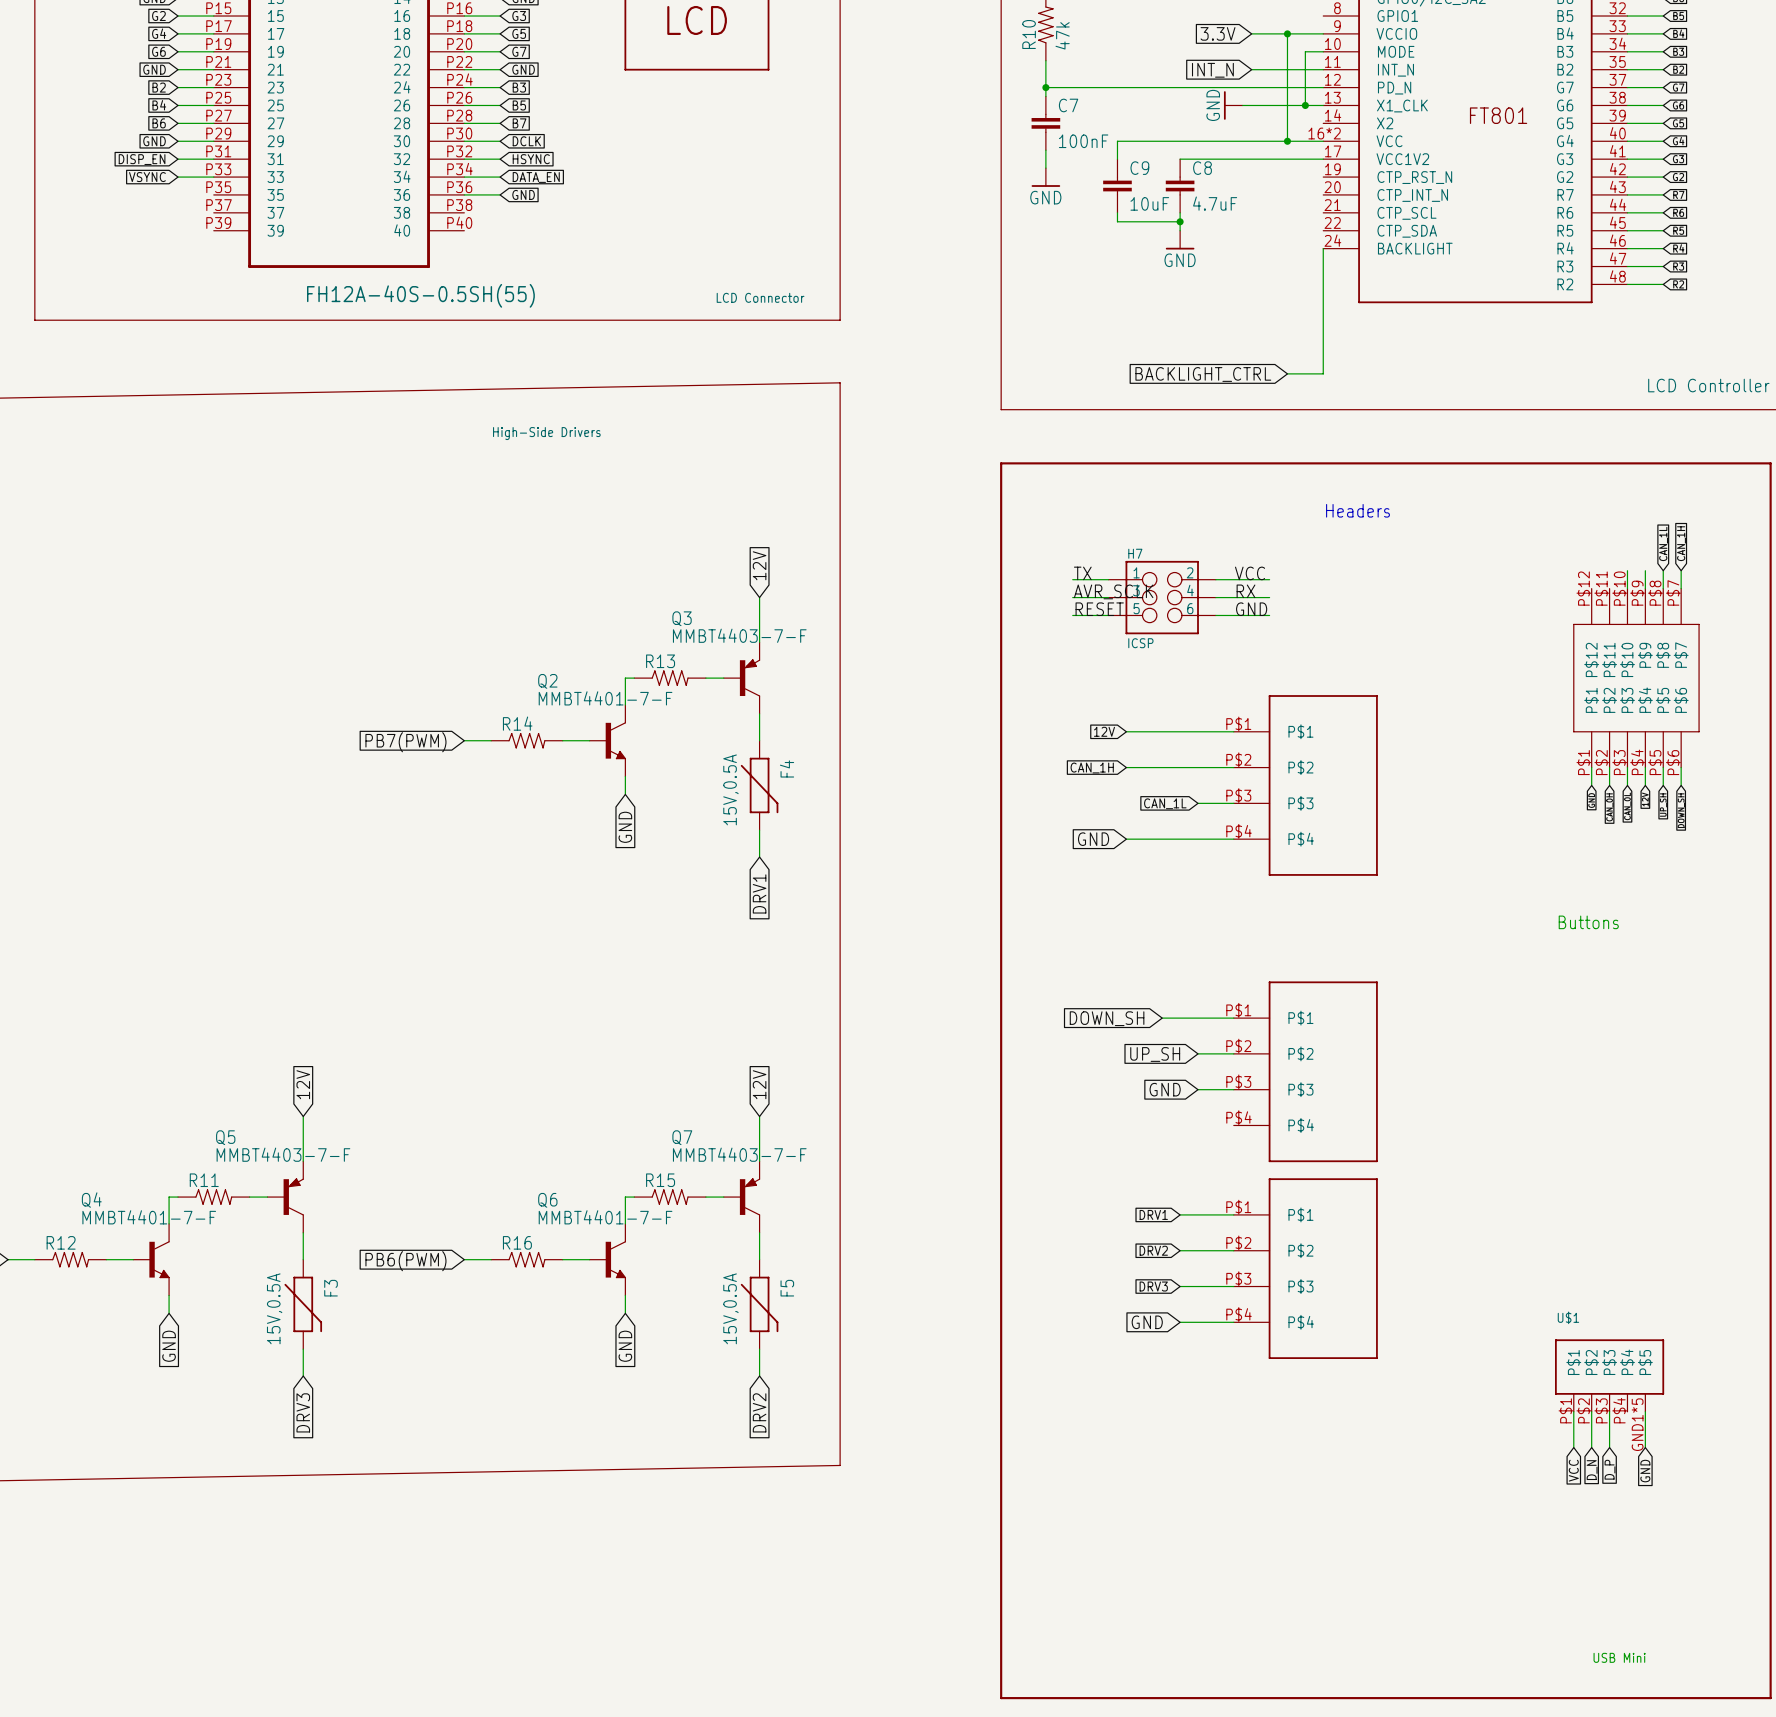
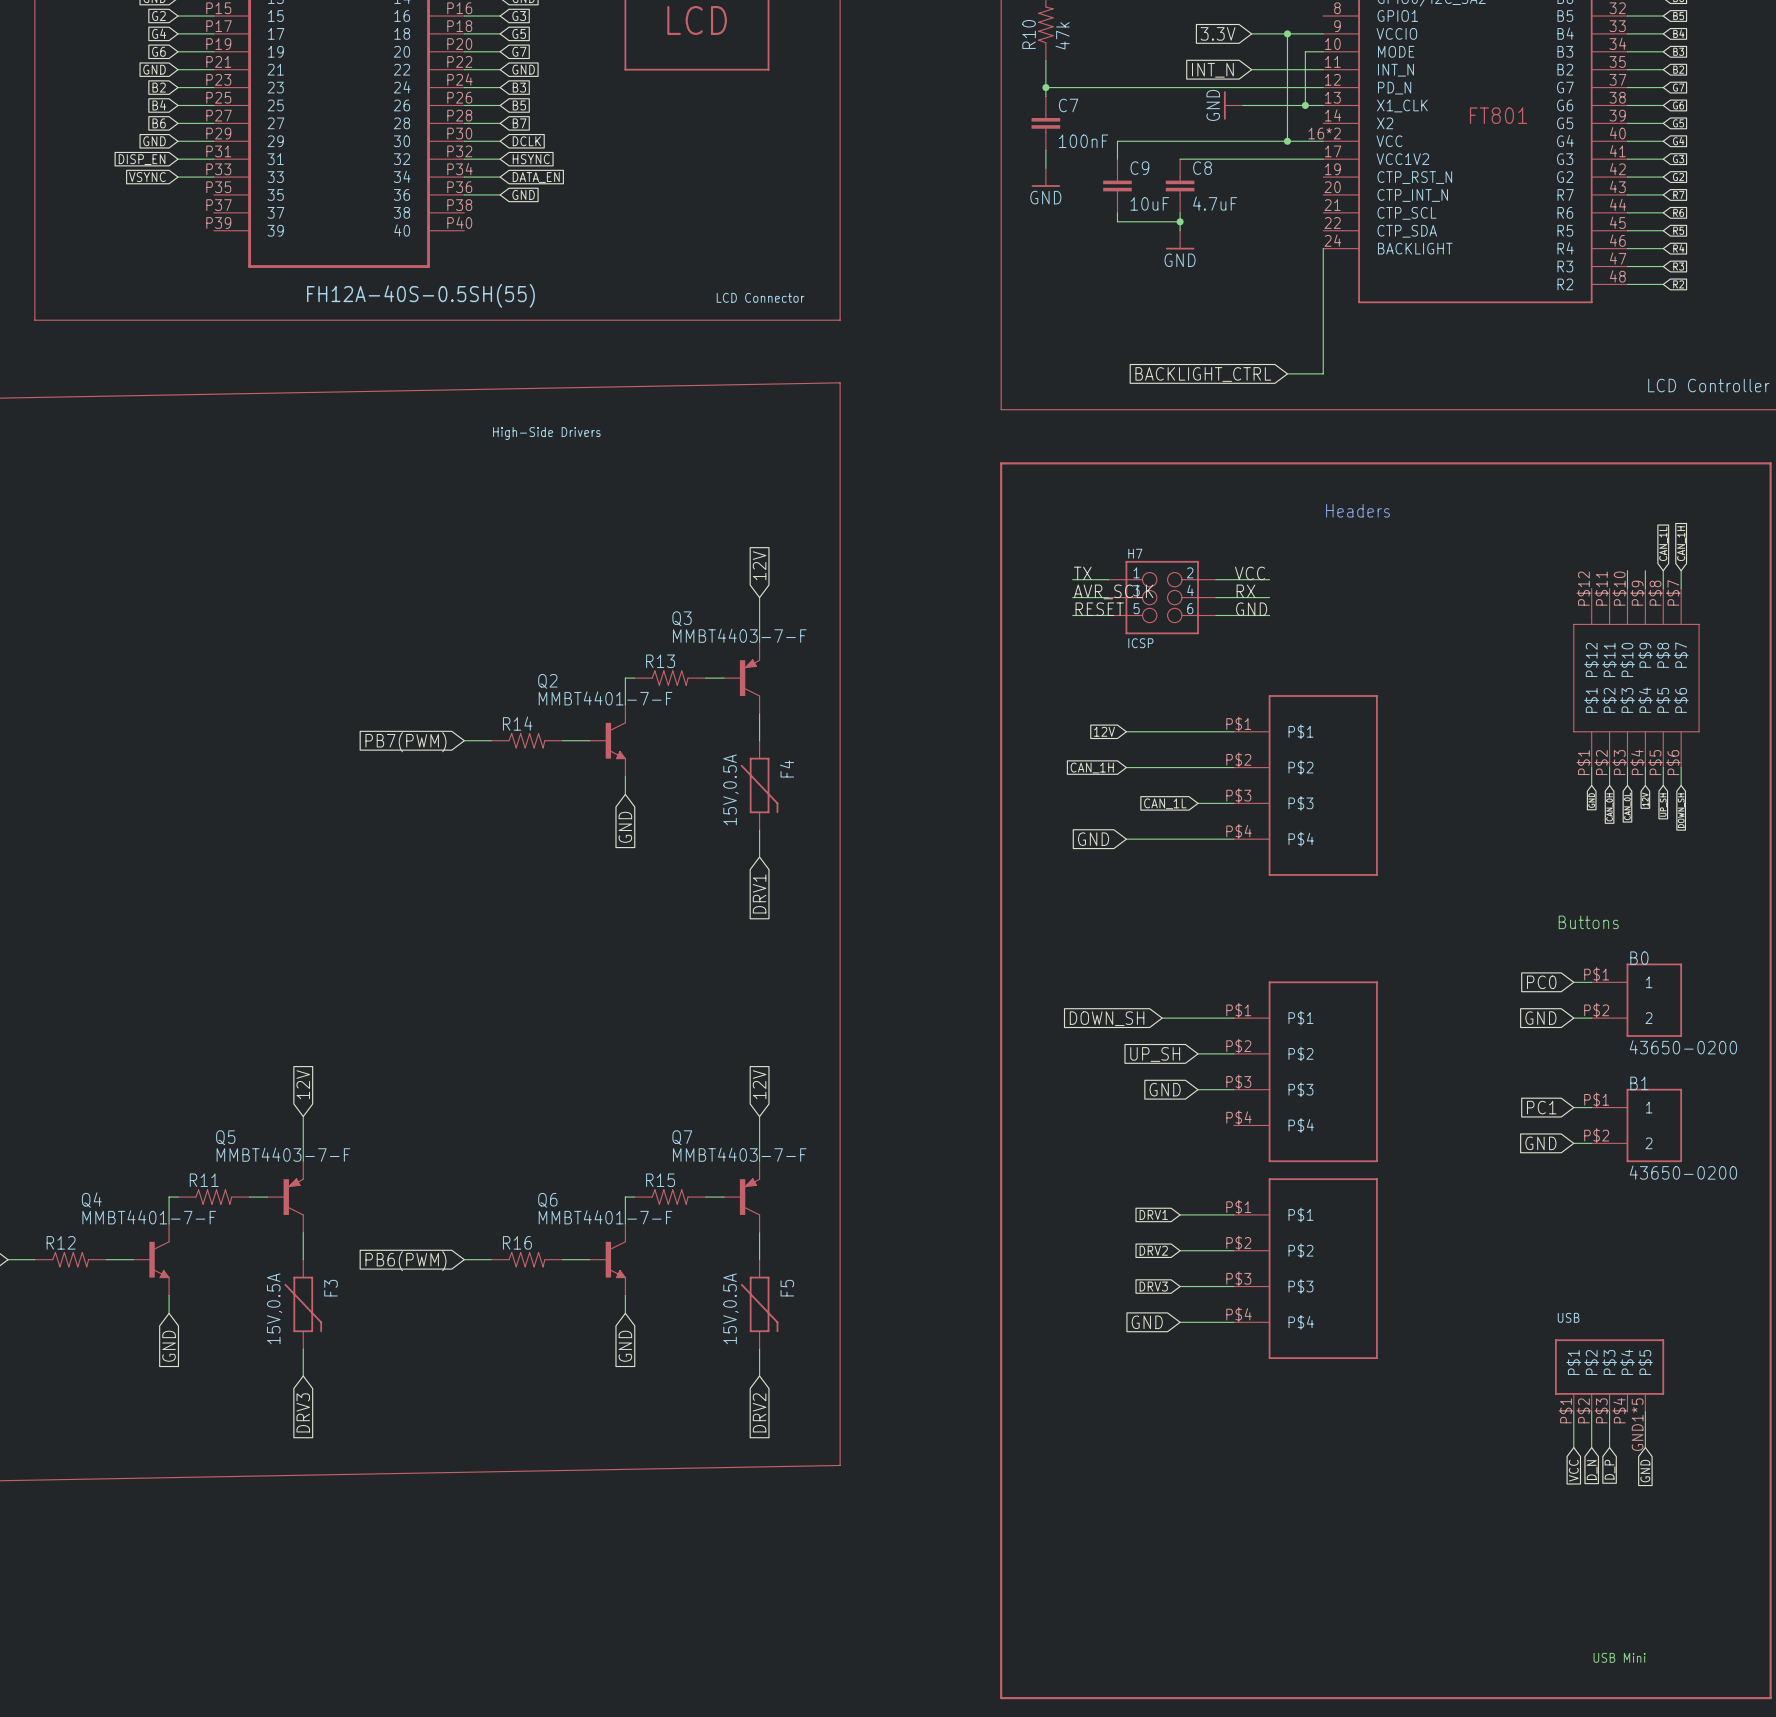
global label: none -> PC0 (1541, 982)
wire: none -> (1573, 982) (1591, 982)
B0: none -> 43650-0200 (1636, 1000)
global label: none -> GND (1540, 1018)
wire: none -> (1573, 1018) (1591, 1018)
global label: none -> PC1 (1541, 1107)
wire: none -> (1573, 1107) (1591, 1107)
B1: none -> 43650-0200 (1636, 1125)
global label: none -> GND (1540, 1143)
wire: none -> (1573, 1143) (1591, 1143)
U$1 name: U$1 (1568, 1317) -> USB (1568, 1317)

